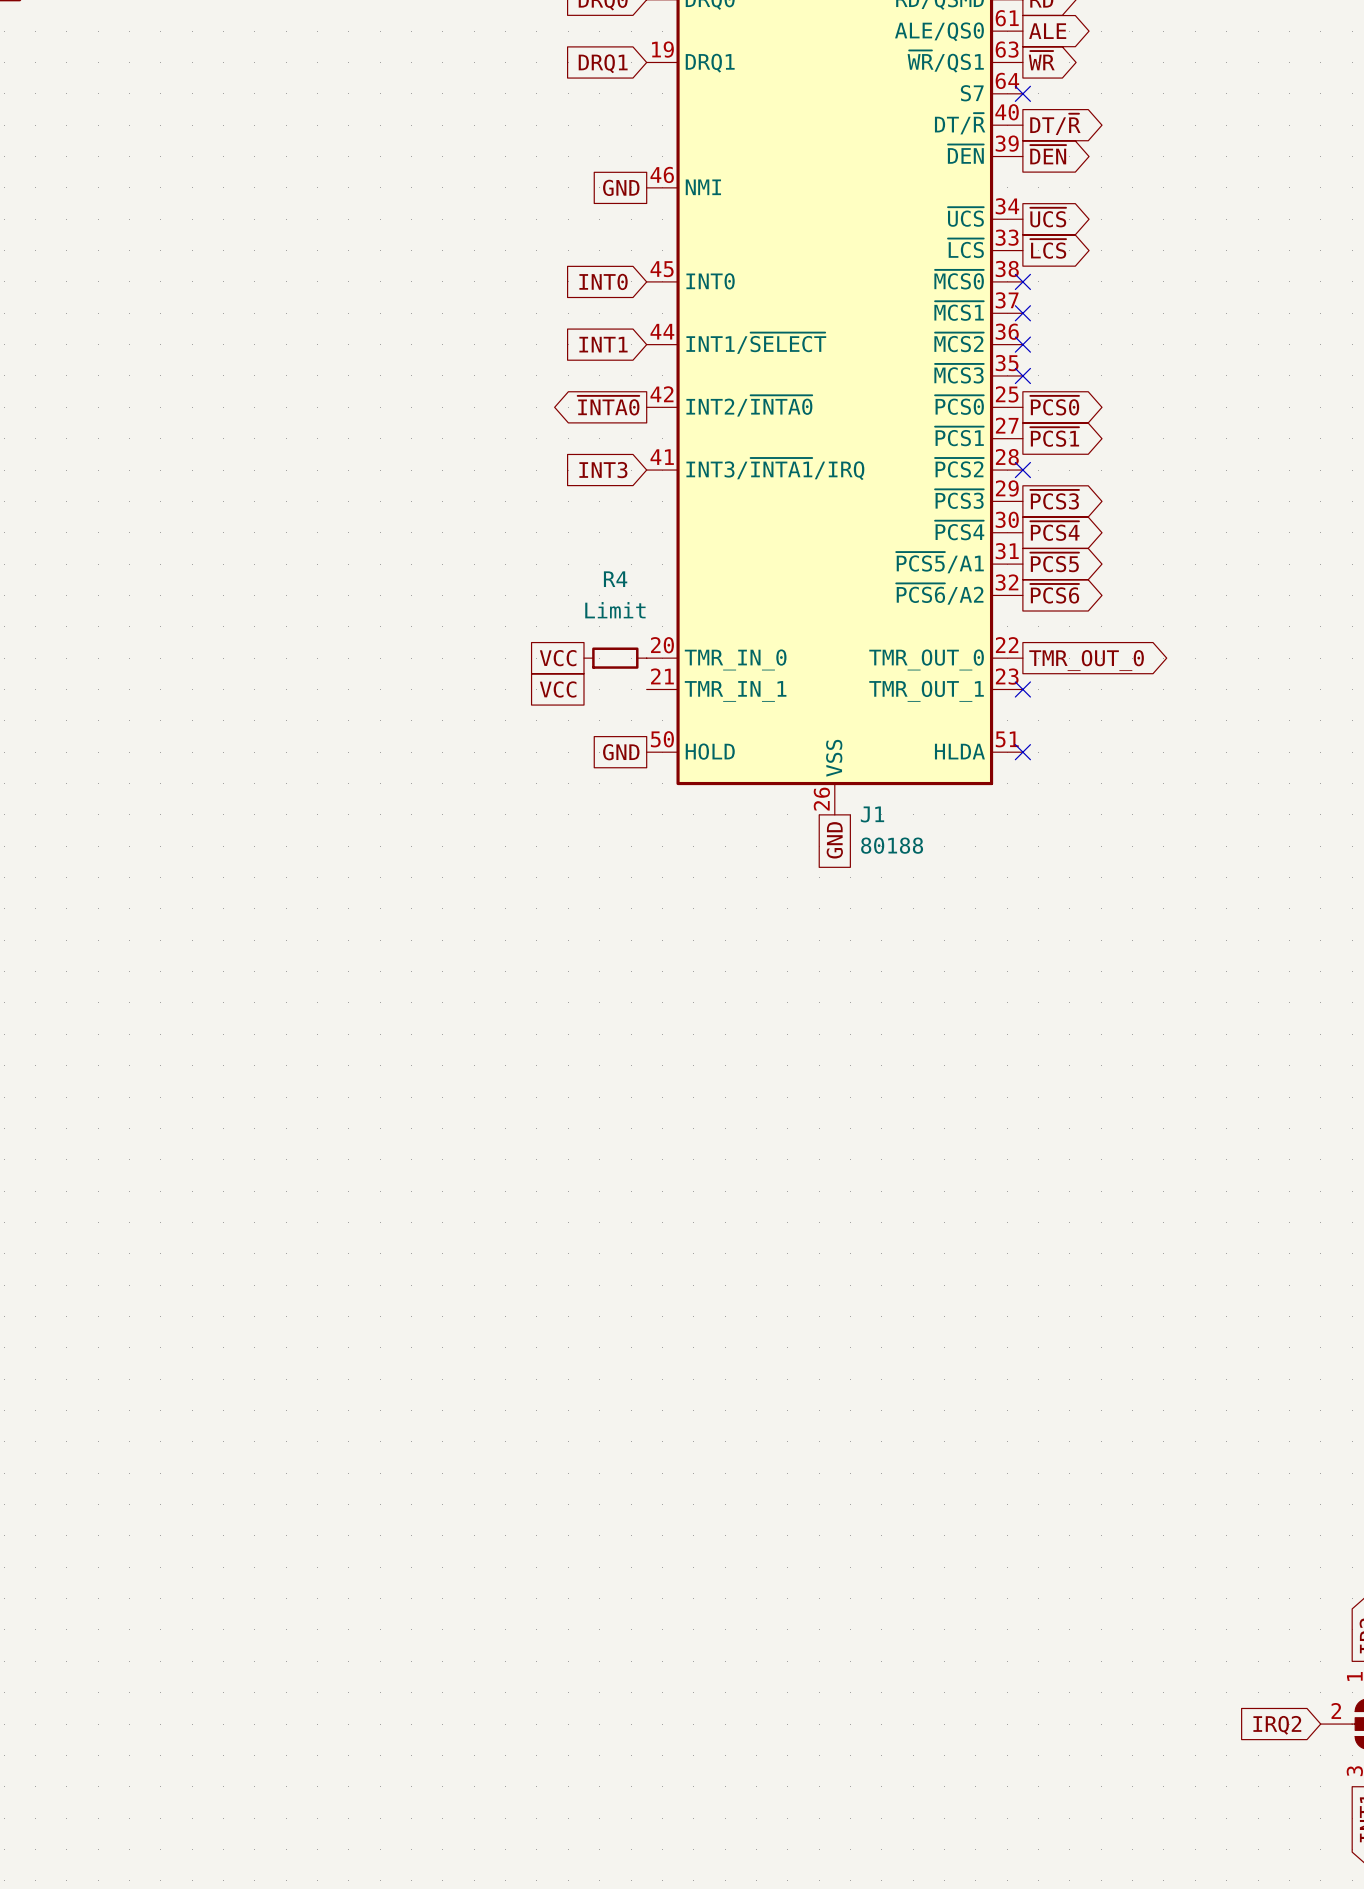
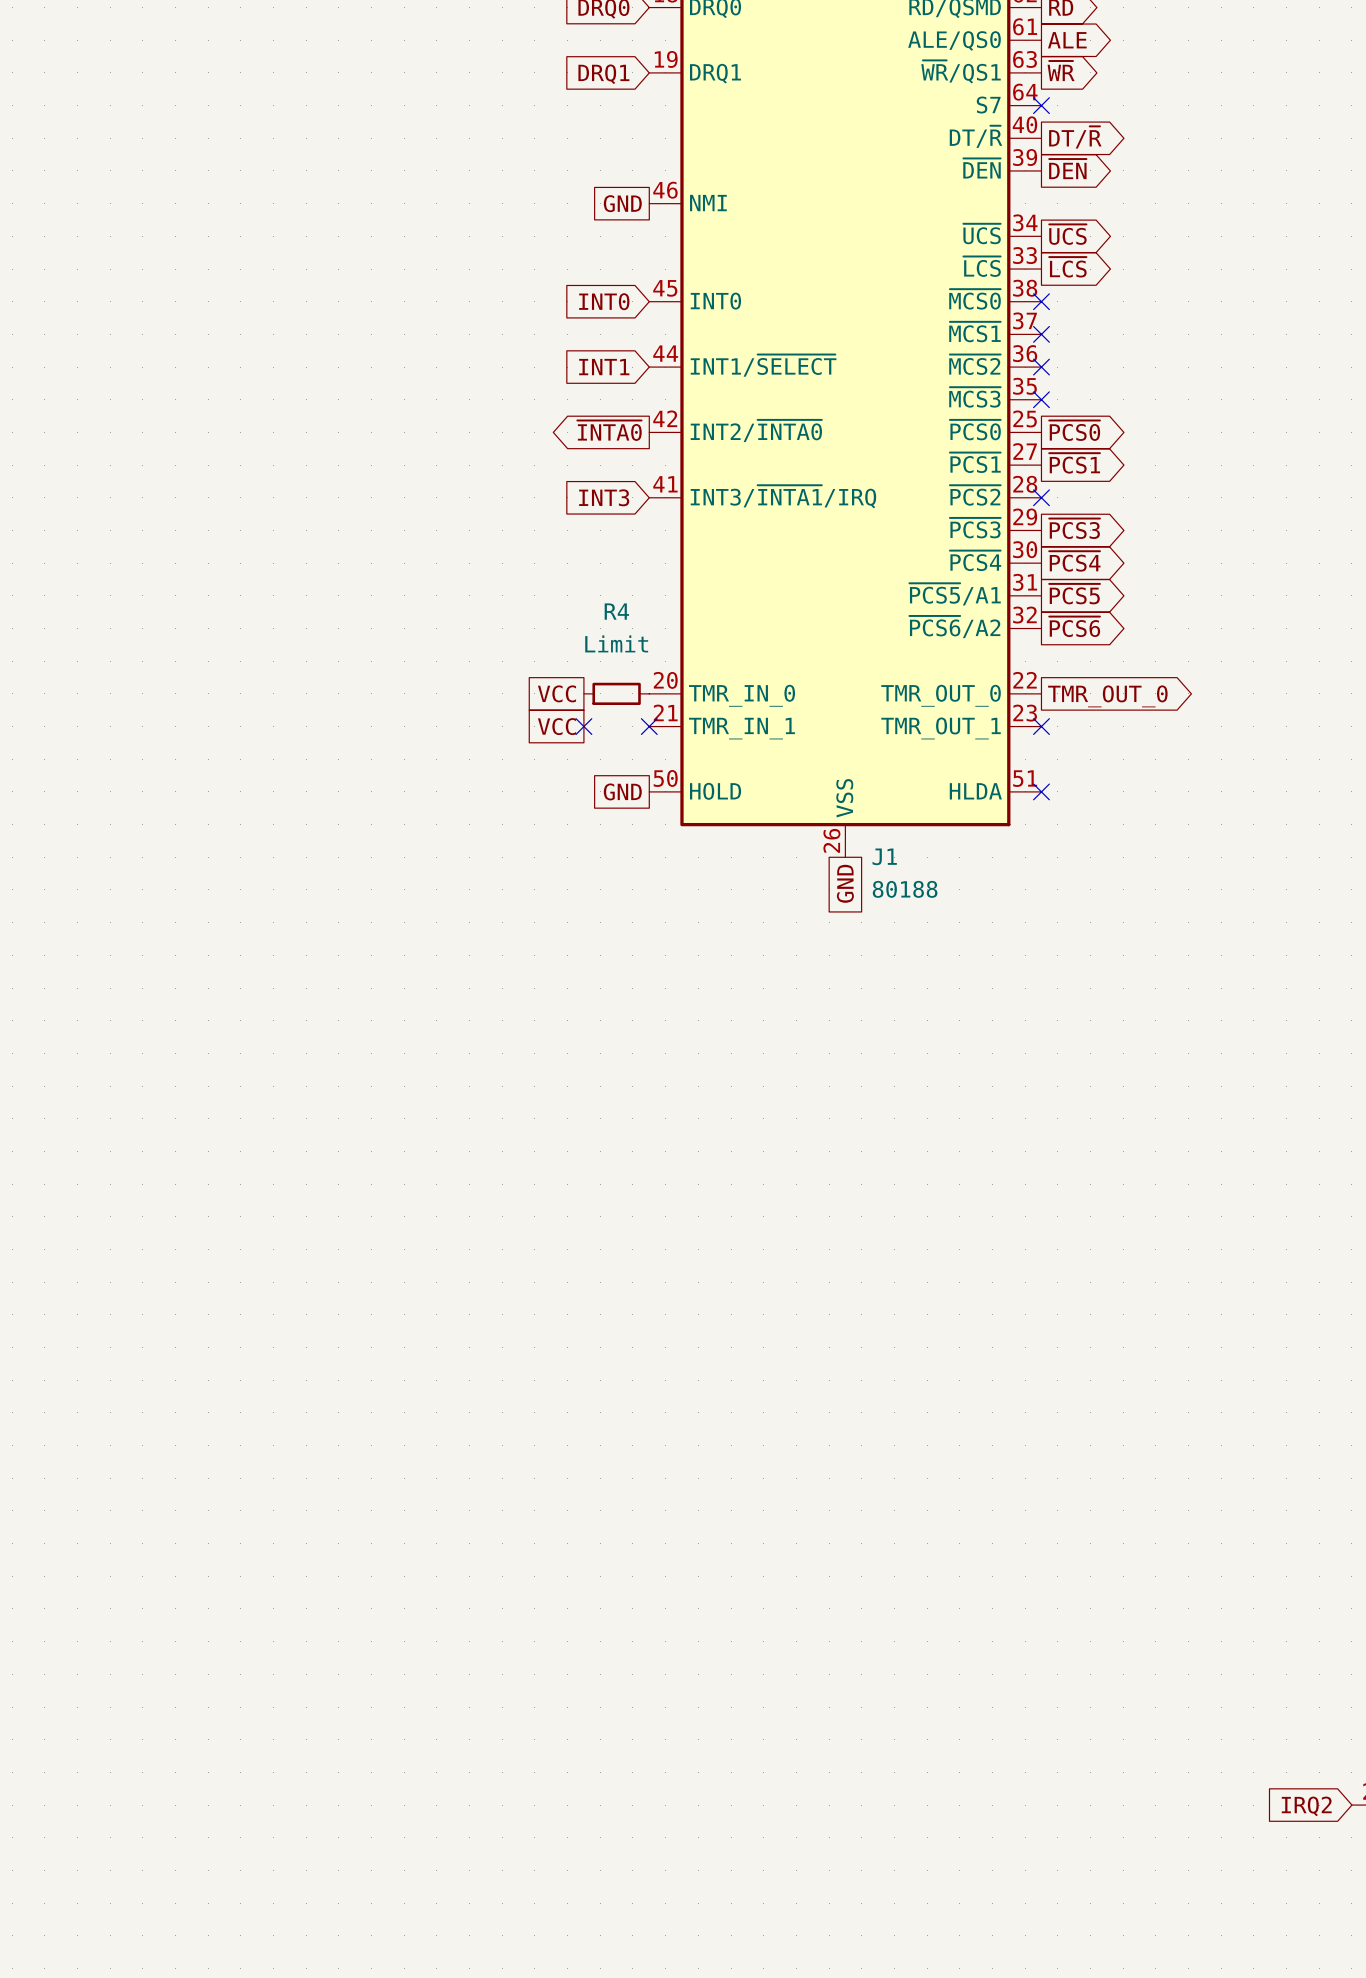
no-connect mark: none -> (583, 726)
no-connect mark: none -> (649, 726)

